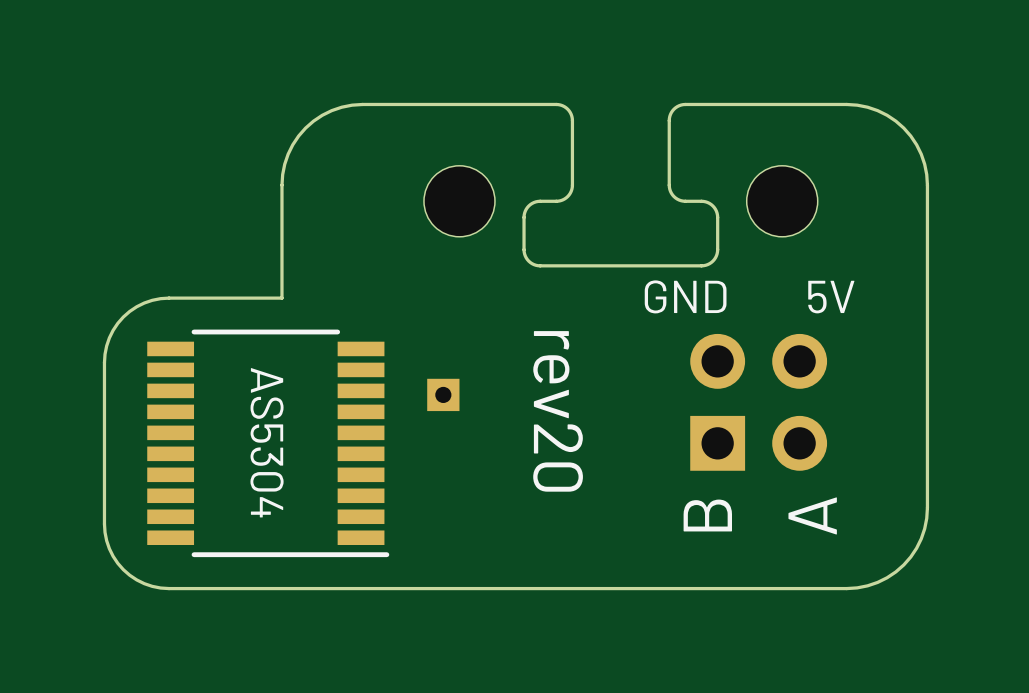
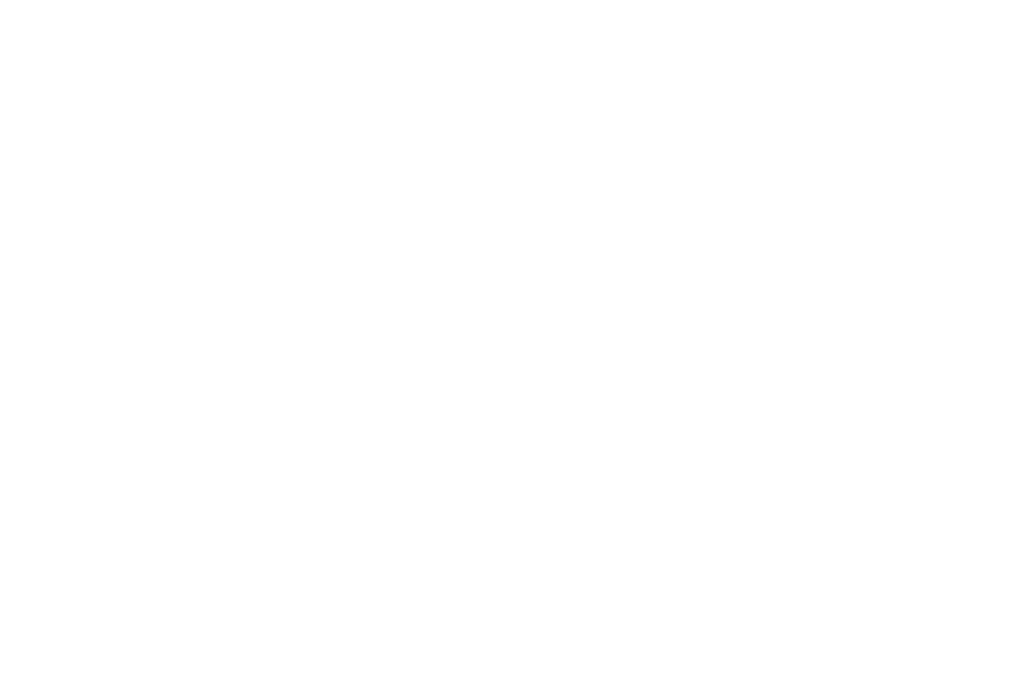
board edge: (846, 104) (685, 104) (673, 109) (669, 120) (670, 191) (673, 196) (681, 200) (709, 203) (714, 207) (717, 215) (717, 253) (711, 262) (701, 265) (540, 265) (533, 264) (527, 259) (524, 249) (524, 217) (526, 209) (535, 201) (562, 200) (569, 194) (571, 189) (572, 118) (569, 110) (562, 105) (362, 104) (341, 107) (322, 115) (298, 136) (284, 164) (281, 185) (281, 298) (169, 298) (152, 300) (129, 311) (117, 323) (109, 337) (104, 362) (104, 524) (106, 540) (113, 556) (123, 569) (136, 579) (152, 586) (169, 588) (846, 588) (867, 585) (887, 577) (910, 557) (921, 538) (926, 518) (926, 174) (916, 144) (895, 121) (867, 107) (846, 104) -> none
part: (459, 201) -> none
part: (782, 201) -> none
text: GND (685, 296) -> none
text: 5V (831, 297) -> none
part: (443, 394) -> none
part: (758, 402) -> none
text: rev20 (558, 411) -> none
part: AS5304 (268, 443) -> none
text: B (707, 515) -> none
text: A (812, 516) -> none

